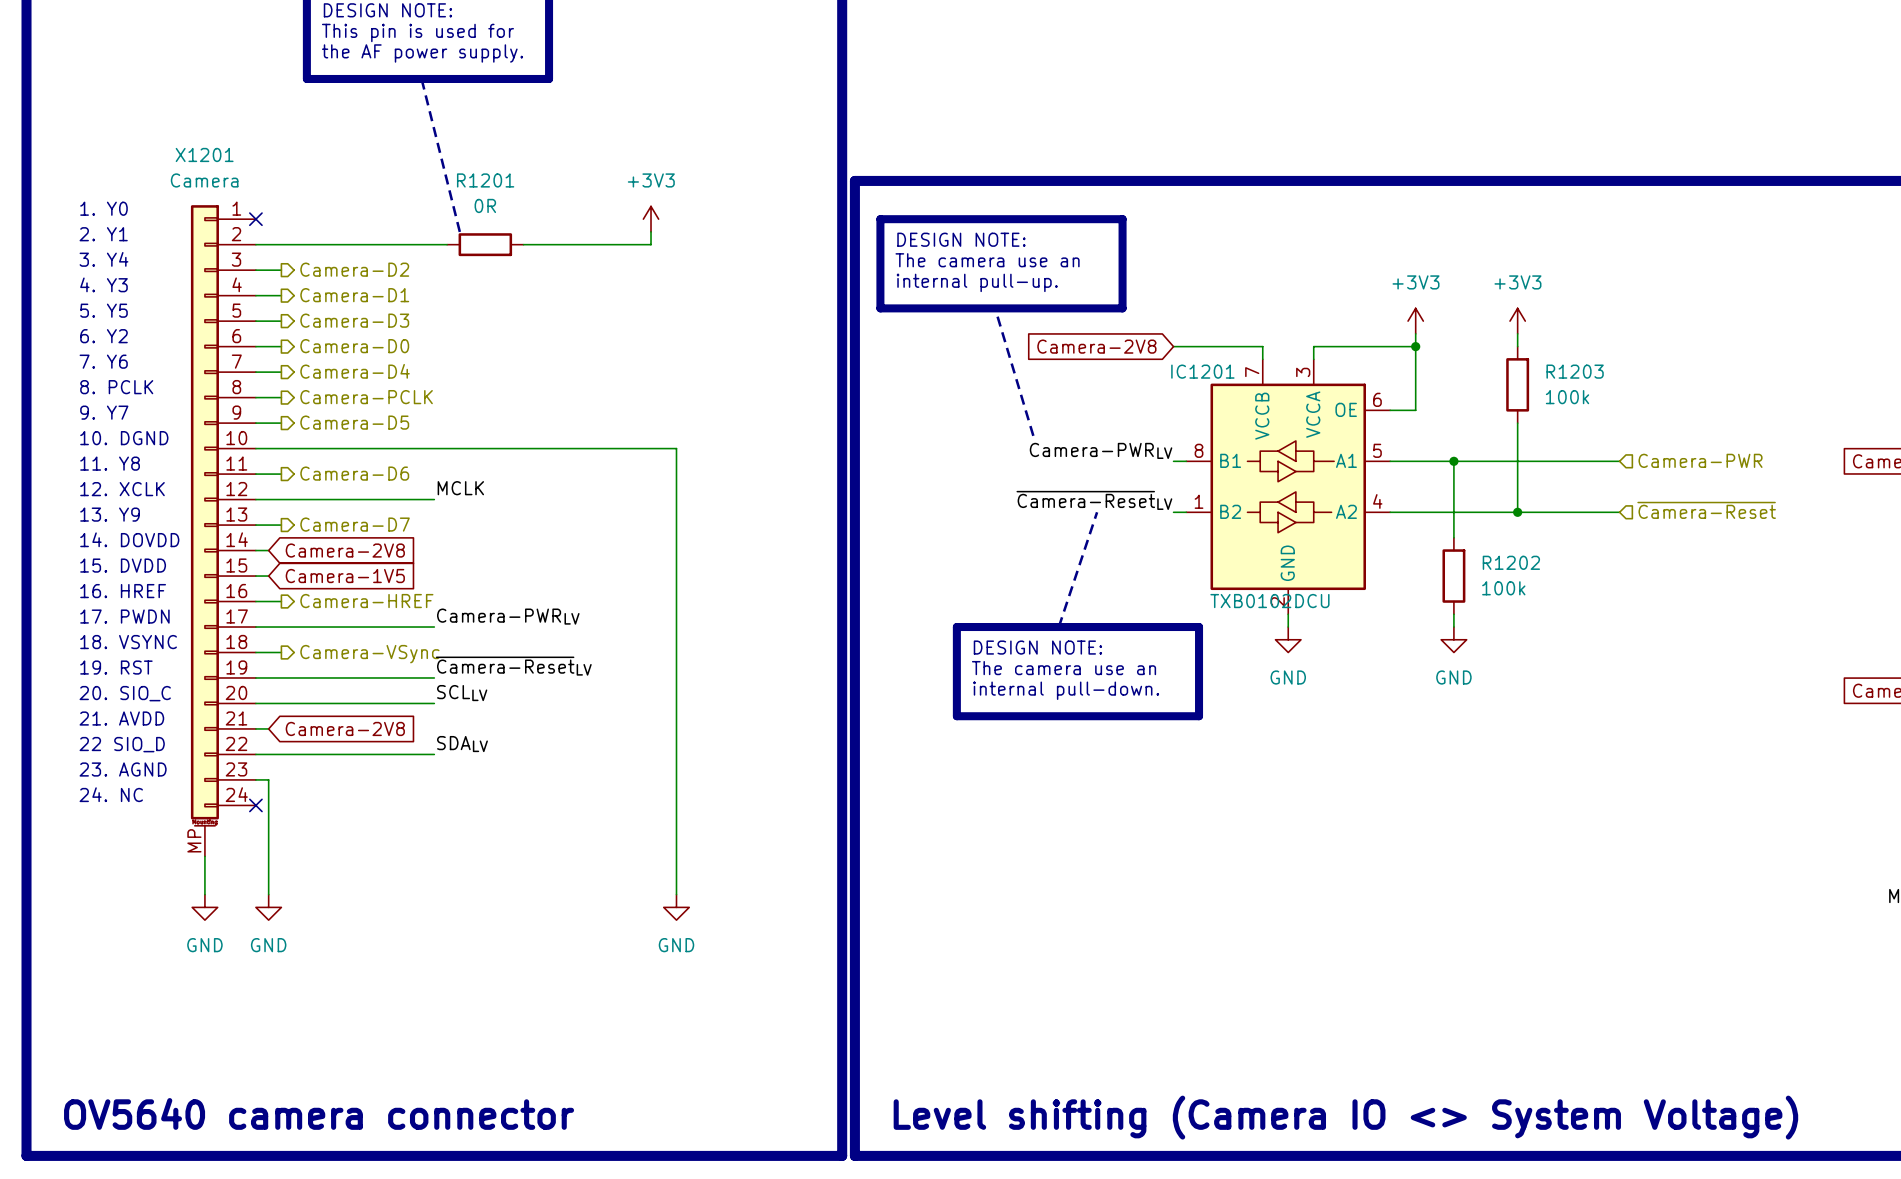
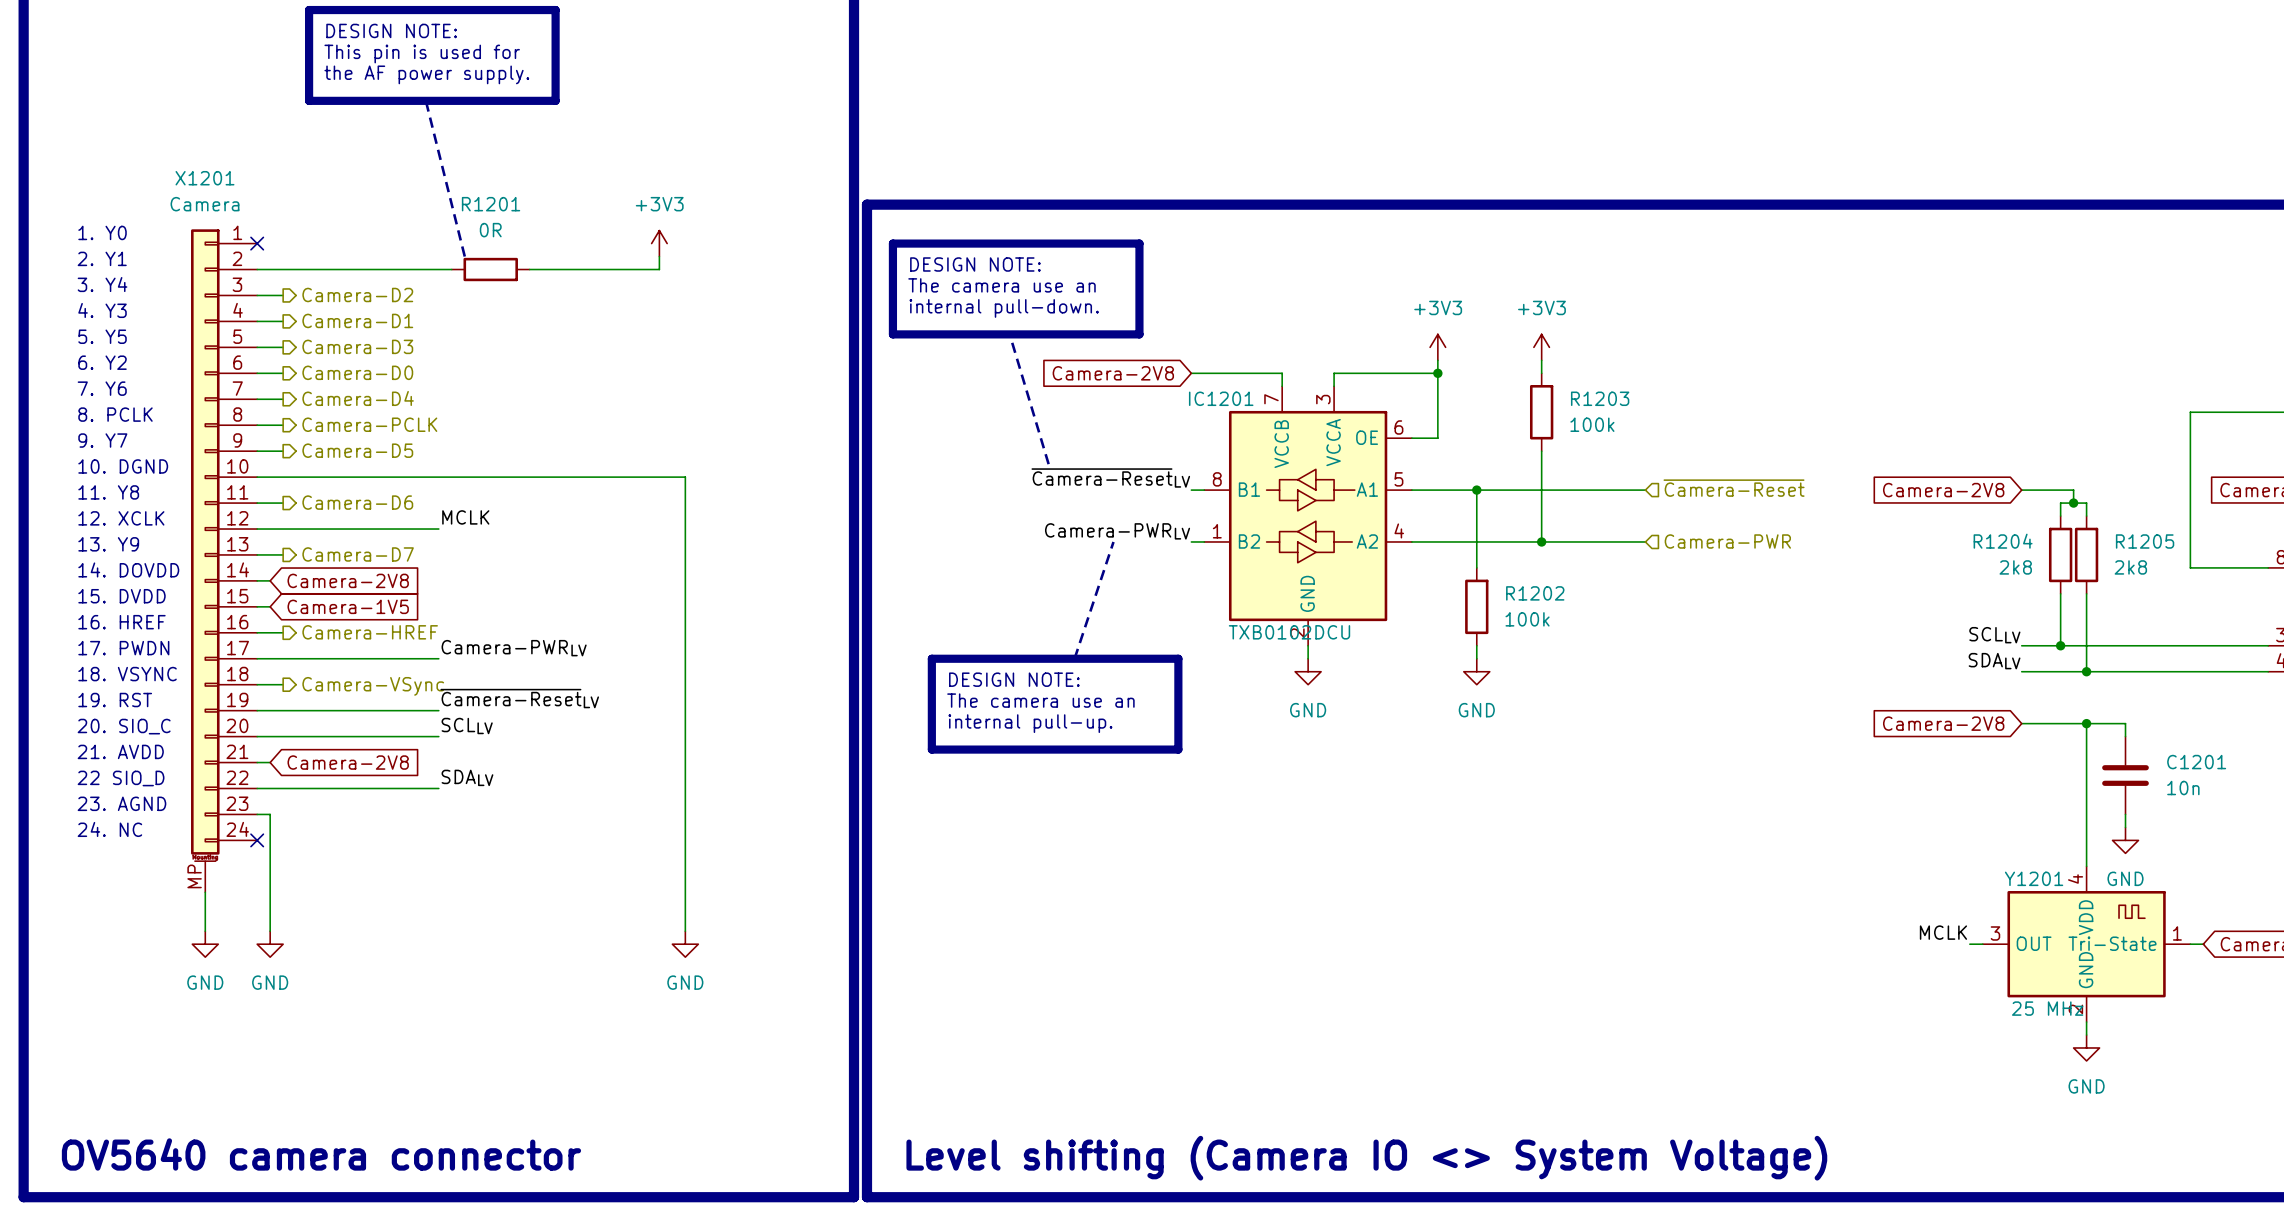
text: internal pull-up. (977, 282) -> internal pull-down. (1004, 308)
label: Camera-PWRLV (1101, 450) -> ~{Camera-Reset}LV (1110, 477)
hierarchical label: Camera-PWR (1700, 460) -> ~{Camera-Reset} (1734, 488)
label: ~{Camera-Reset}LV (1094, 500) -> Camera-PWRLV (1117, 531)
hierarchical label: ~{Camera-Reset} (1706, 510) -> Camera-PWR (1727, 541)
line: (956, 627) (956, 716) -> (970, 658) (931, 658) (931, 749) (970, 749)
line: (1160, 627) (1199, 627) (1199, 716) (1160, 716) -> (1178, 658) (1178, 749)
text position: DESIGN NOTE: (1037, 647) -> DESIGN NOTE: (1014, 679)
text position: The camera use an (1064, 668) -> The camera use an (1040, 700)
text: internal pull-down. (1066, 690) -> internal pull-up. (1030, 723)

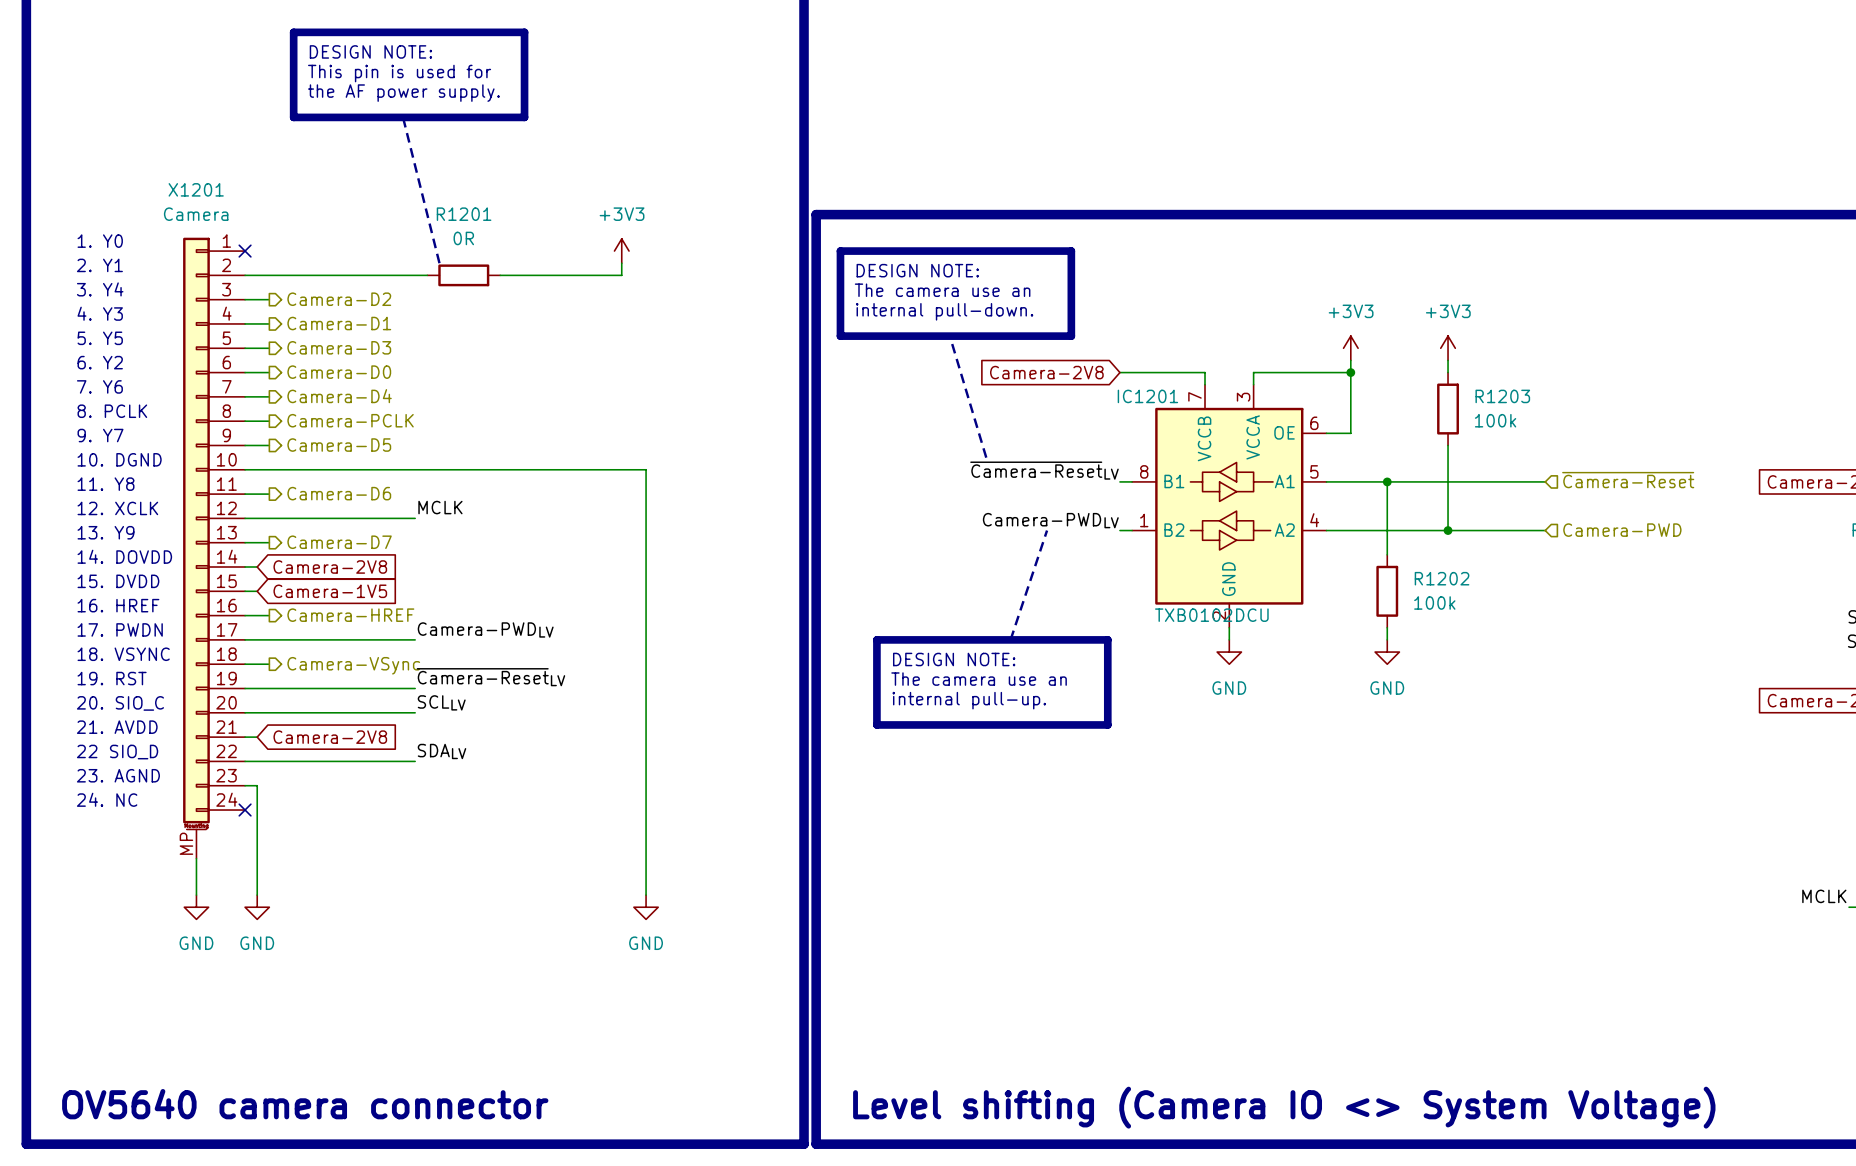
label: Camera-PWRLV (1117, 531) -> Camera-PWDLV (1050, 520)
hierarchical label: Camera-PWR (1727, 541) -> Camera-PWD (1622, 530)
label: Camera-PWRLV (514, 648) -> Camera-PWDLV (485, 629)

